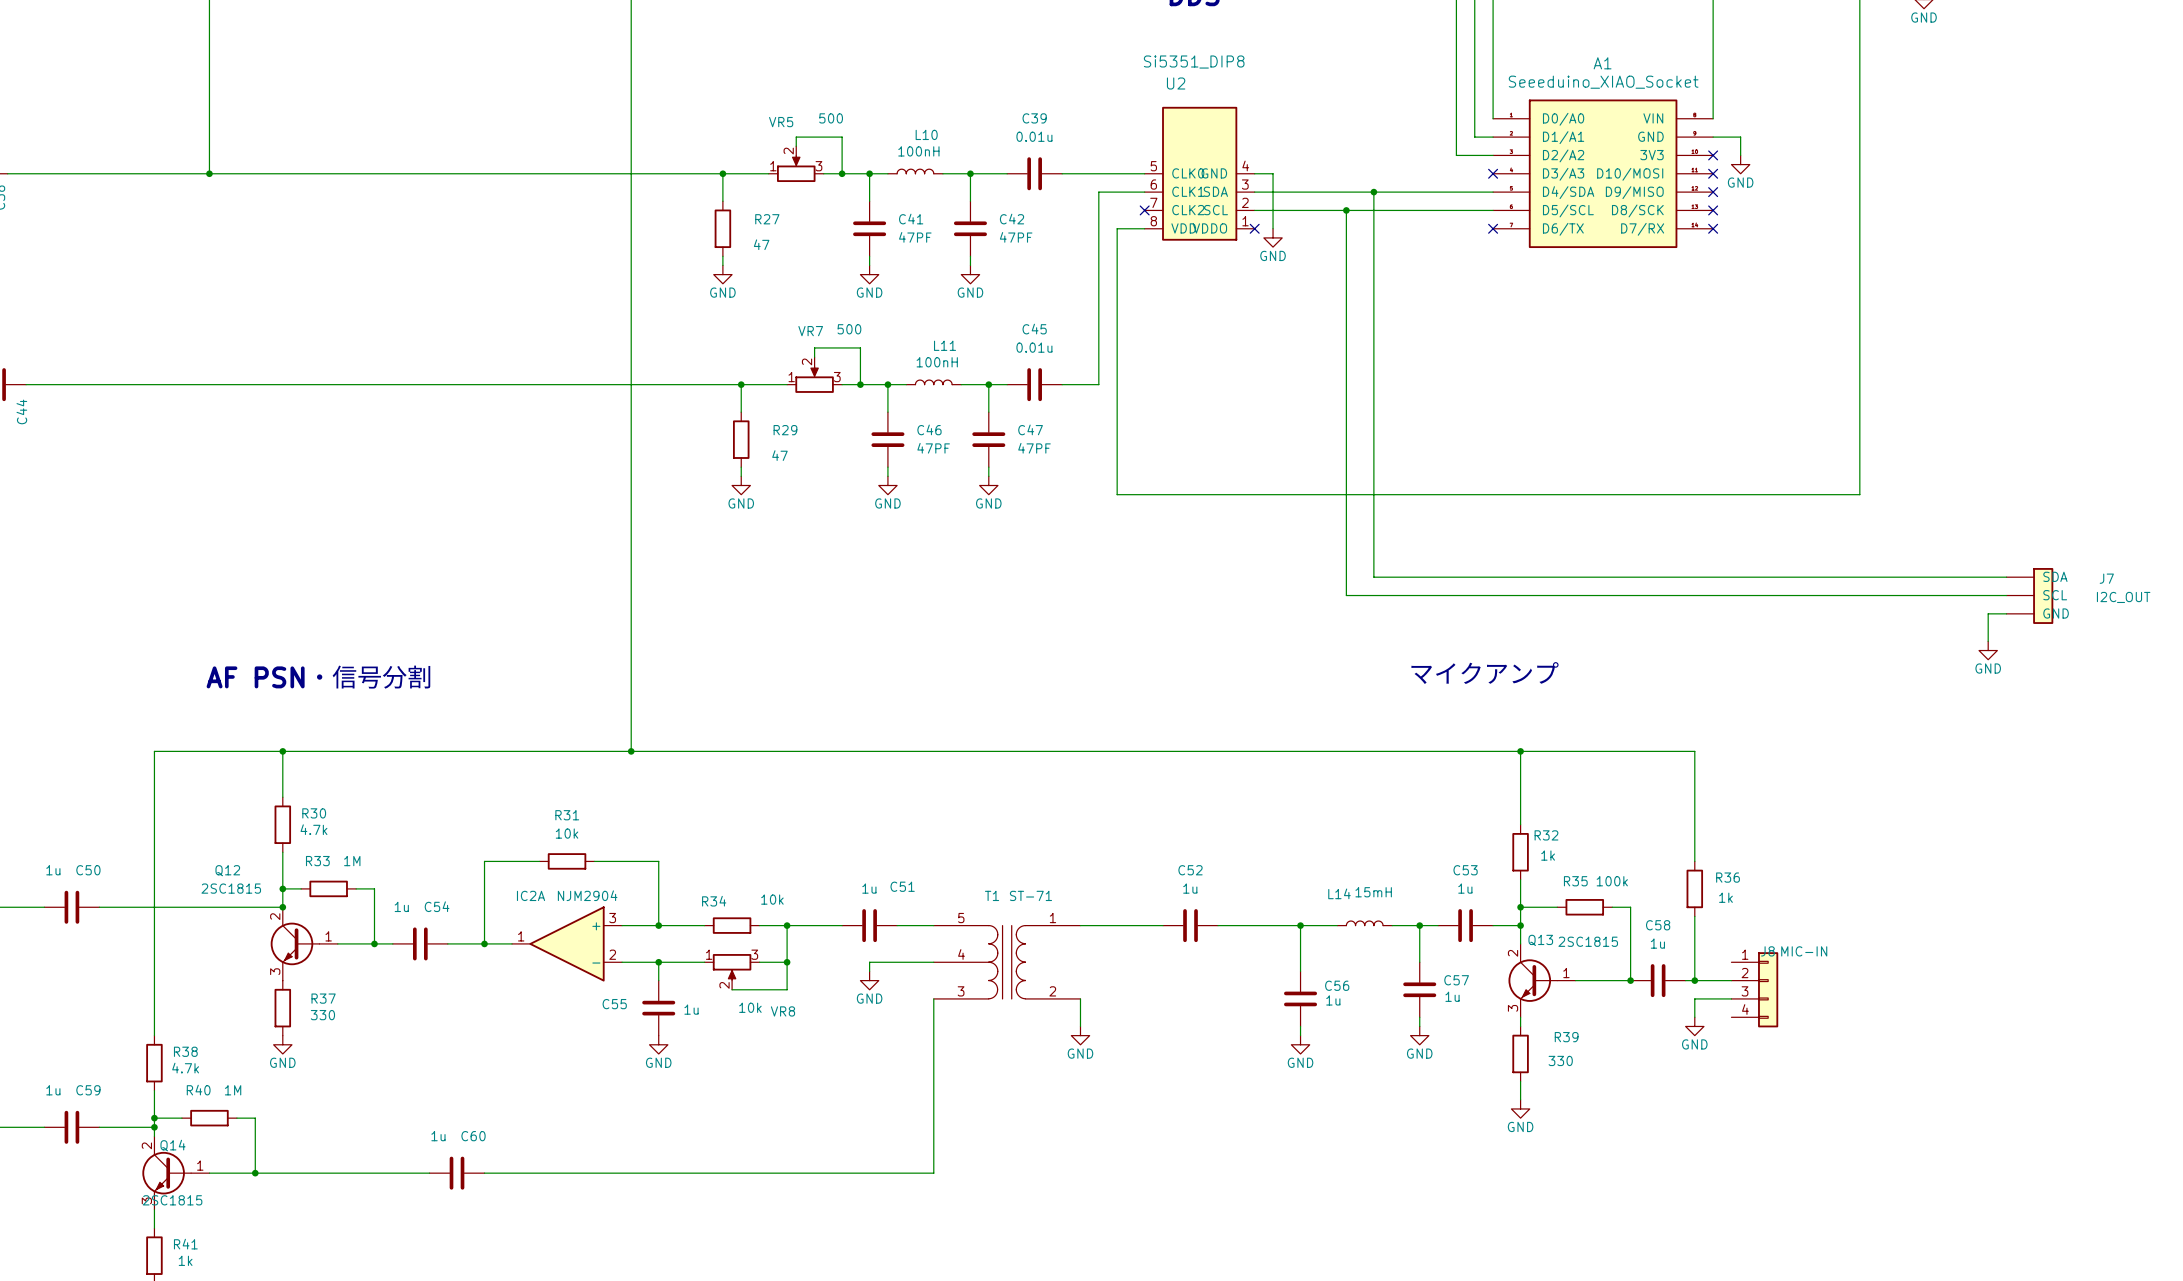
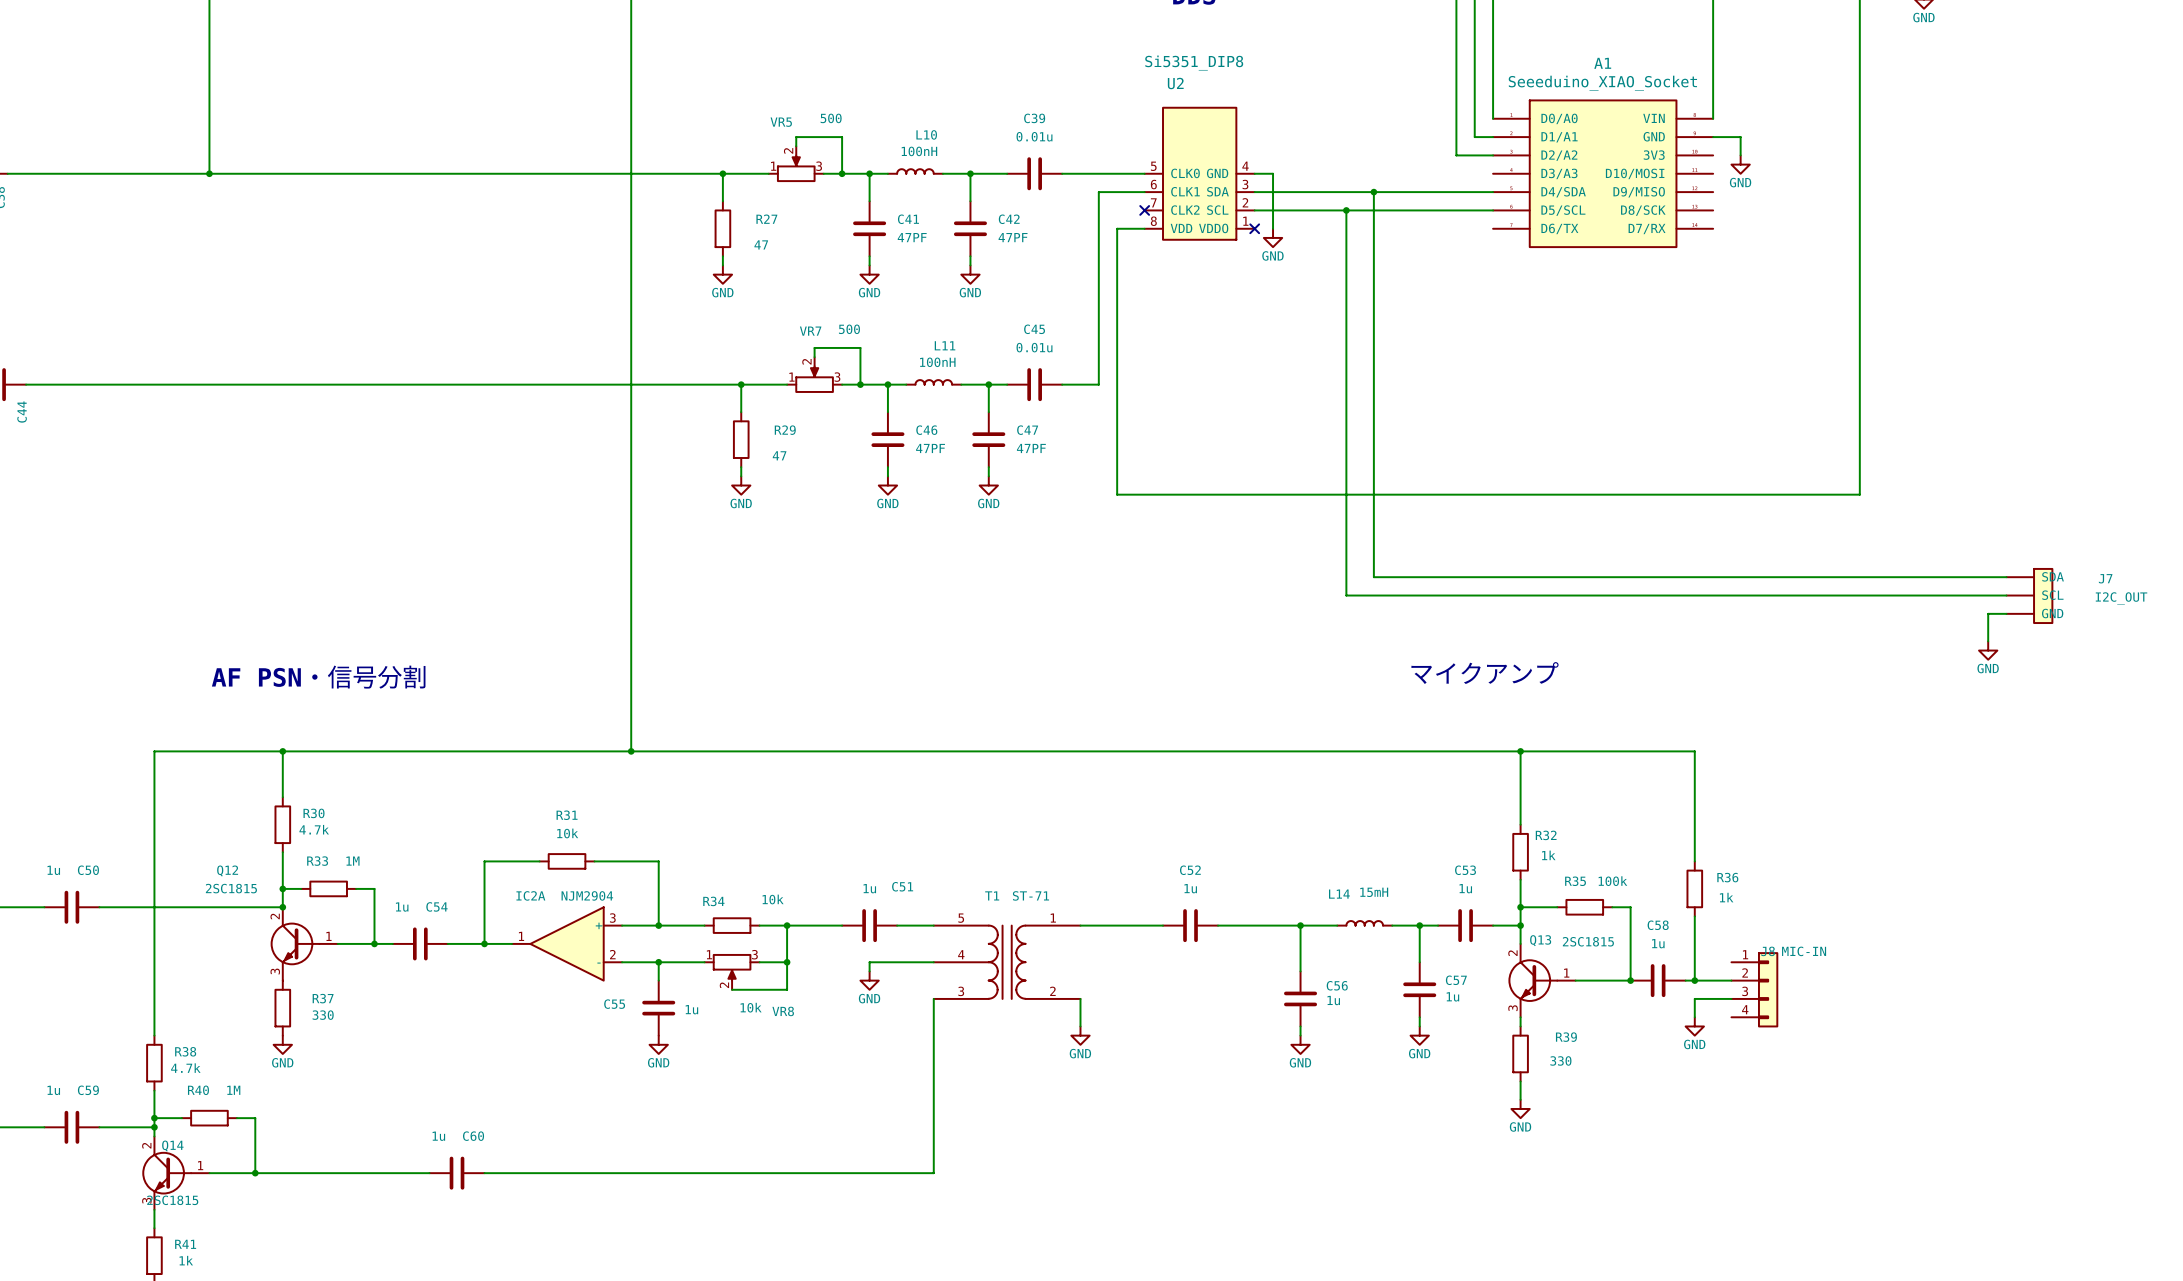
no-connect mark: (1713, 155) -> none
no-connect mark: (1493, 173) -> none
no-connect mark: (1713, 173) -> none
no-connect mark: (1713, 192) -> none
no-connect mark: (1713, 210) -> none
no-connect mark: (1493, 228) -> none
no-connect mark: (1713, 228) -> none

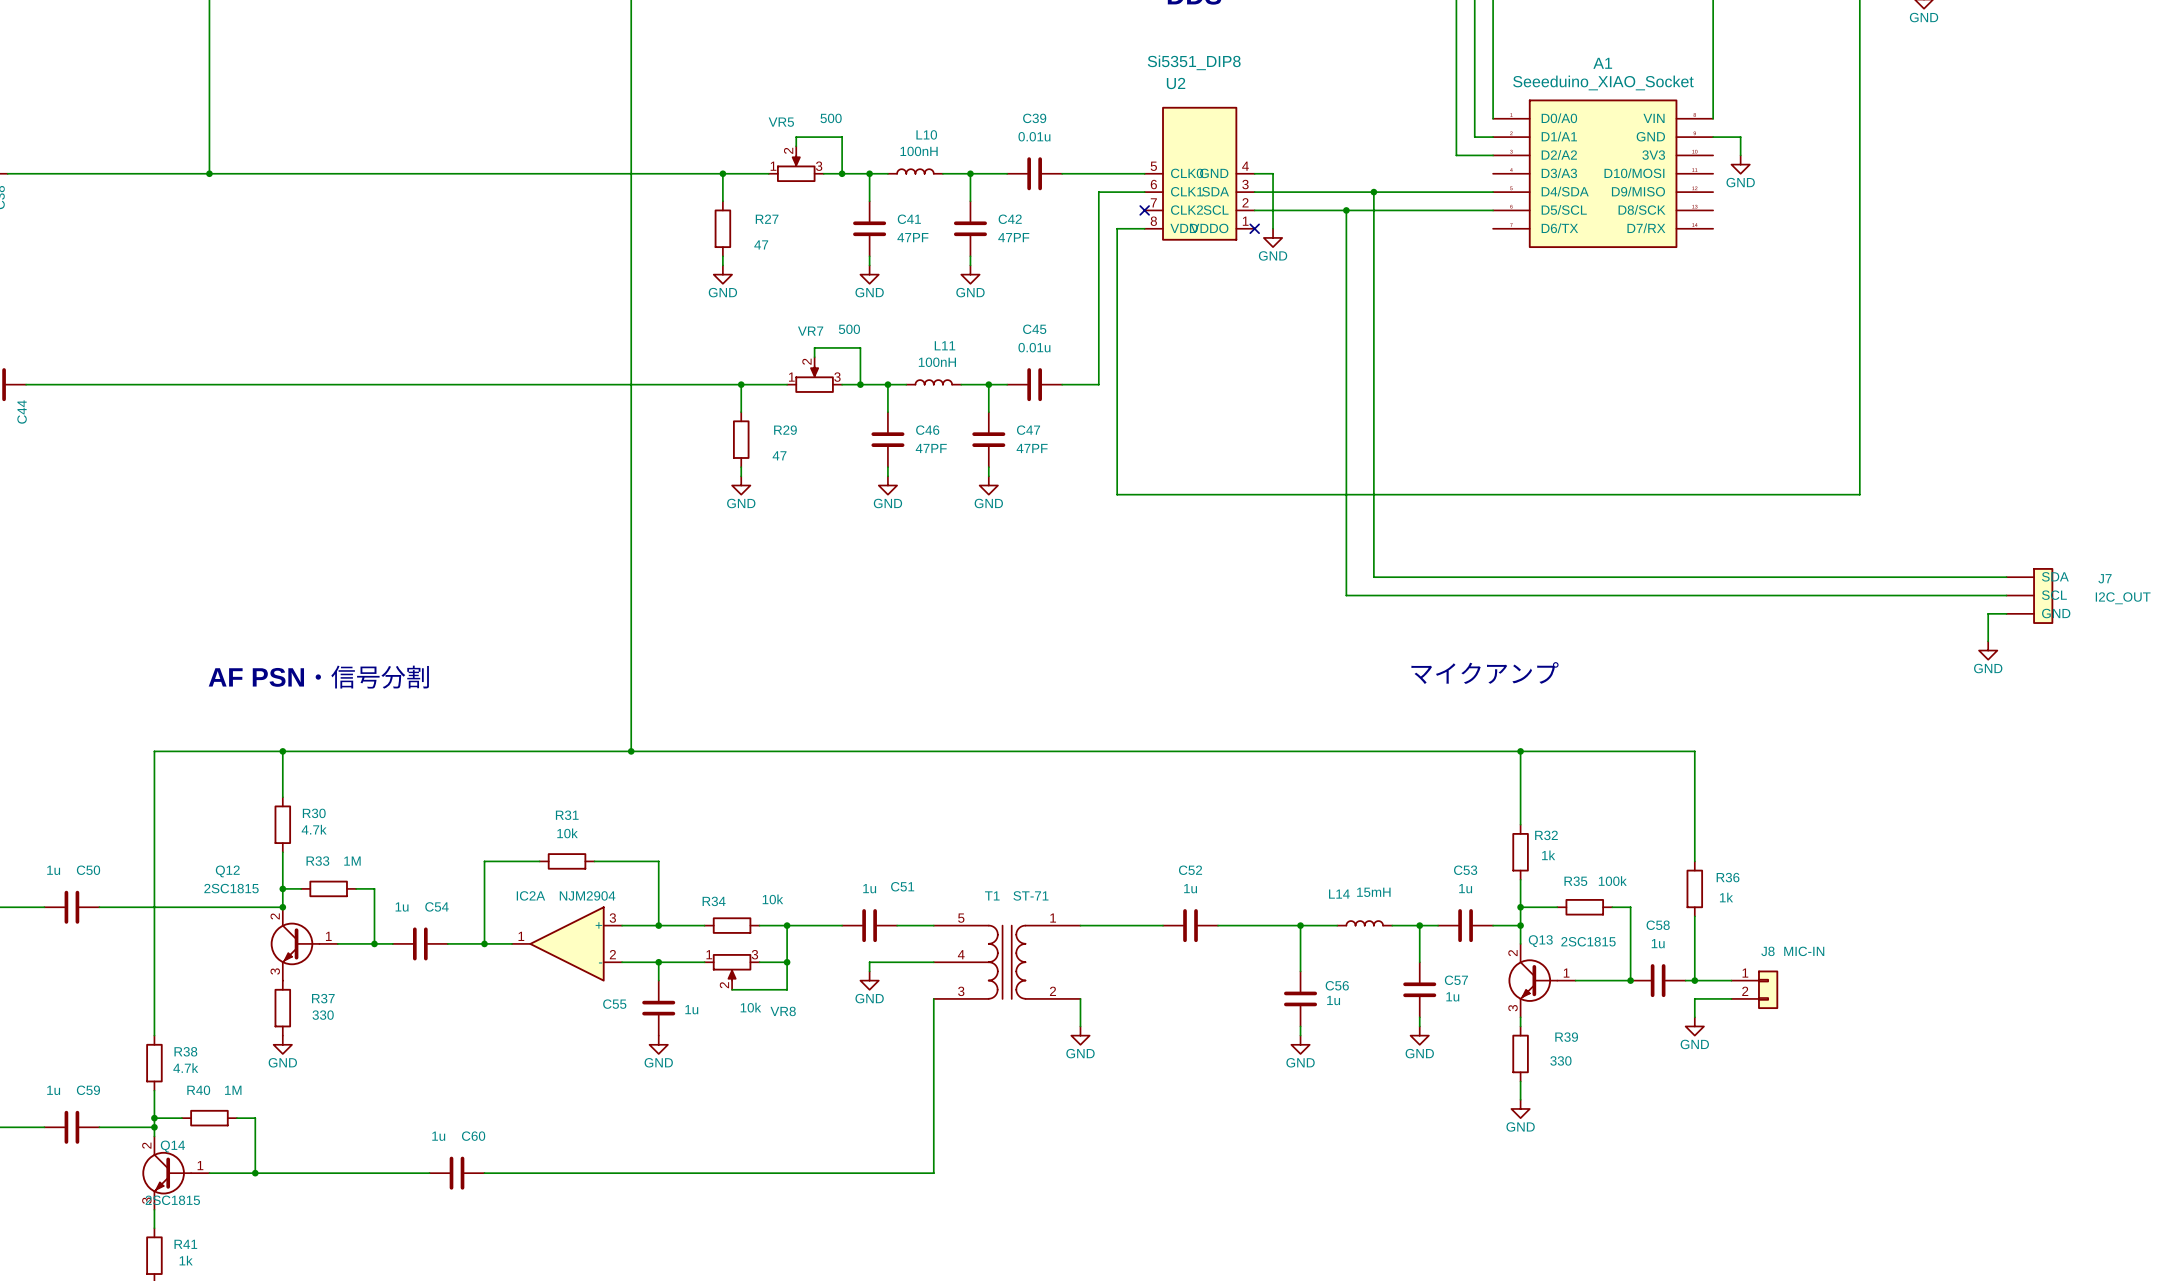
J8 symbol: [1731, 952, 1779, 1028] -> [1731, 970, 1779, 1010]

